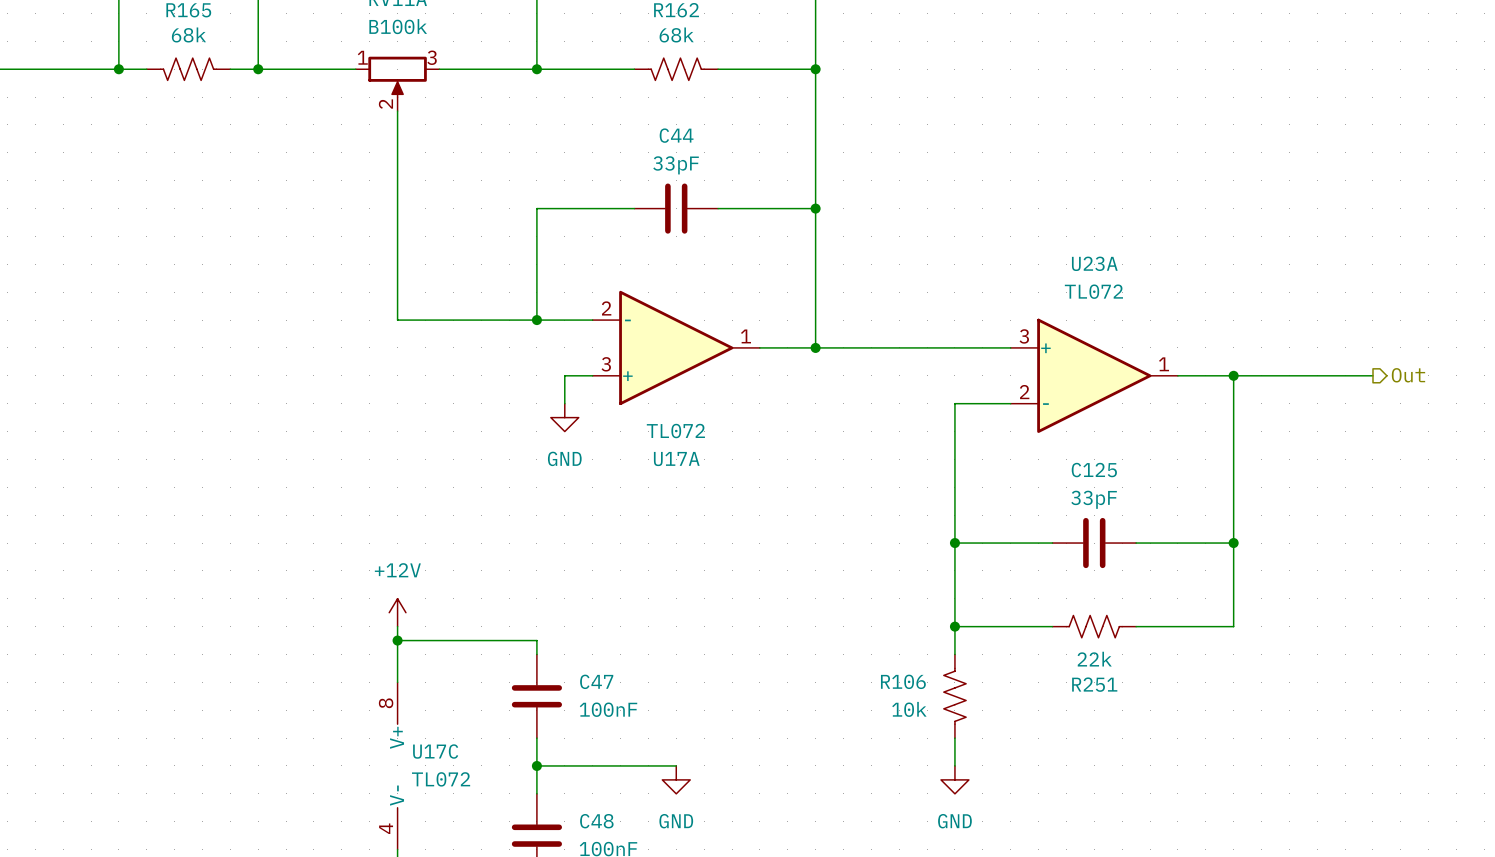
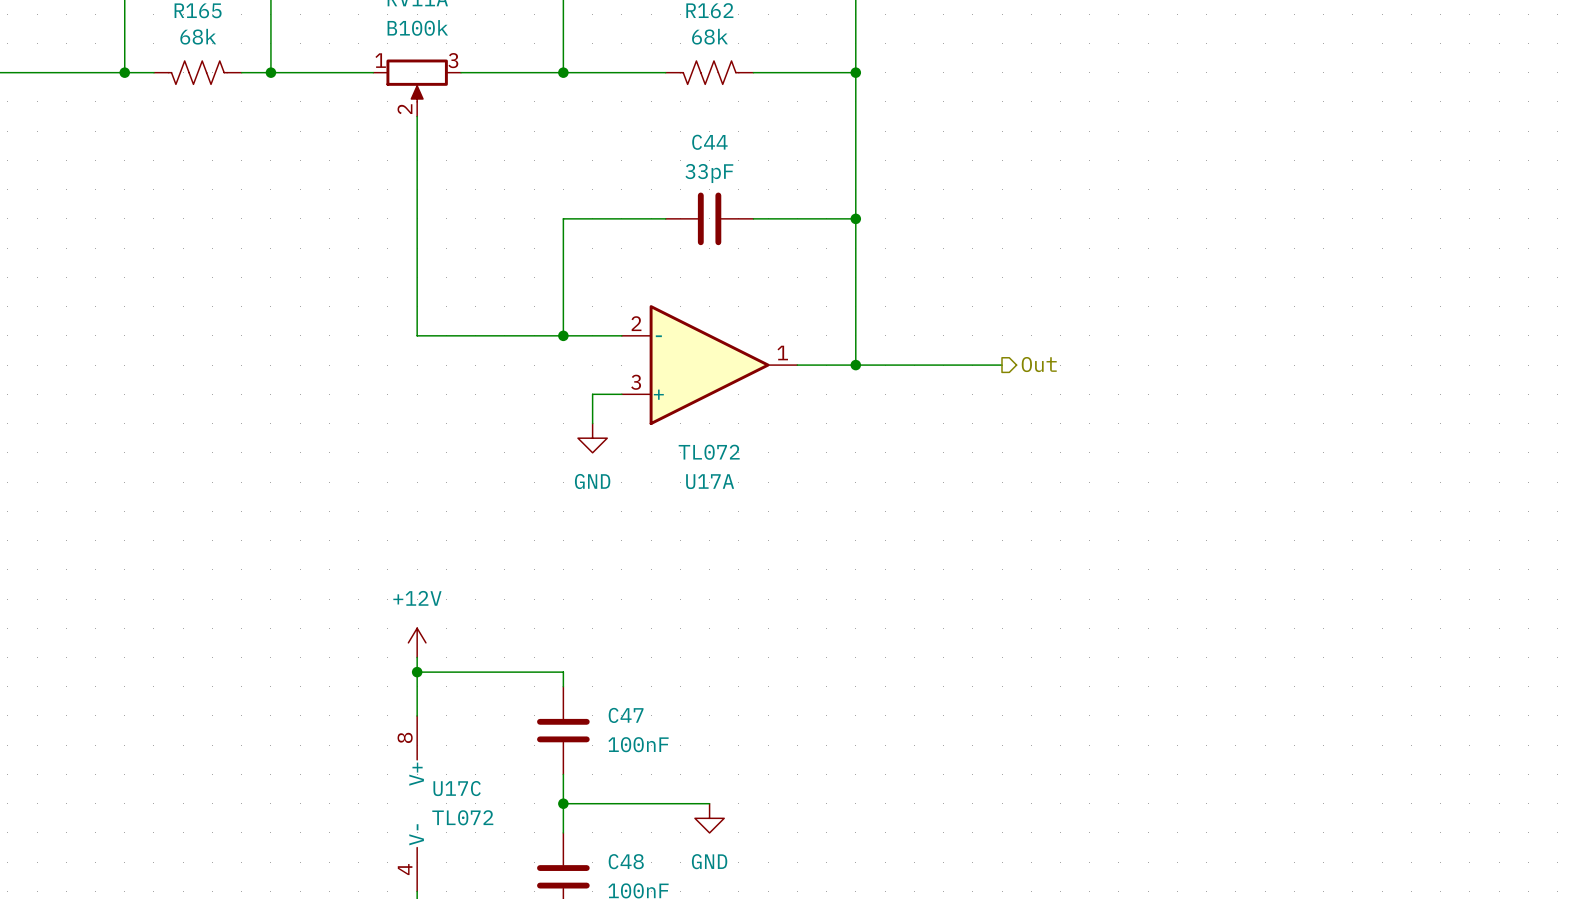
wire: (954, 347) (1010, 347) -> none
hierarchical label: none -> Out (1039, 364)
U23A: TL072 (1094, 375) -> none
wire: (1177, 375) (1372, 375) -> none
wire: (1233, 375) (1233, 626) (1136, 626) -> none
junction: (1233, 375) -> none
hierarchical label: Out (1408, 375) -> none
wire: (1010, 403) (954, 403) (954, 654) -> none
wire: (954, 543) (1052, 543) -> none
junction: (954, 543) -> none
C125: 33pF (1094, 543) -> none
wire: (1136, 543) (1233, 543) -> none
junction: (1233, 543) -> none
wire: (954, 626) (1052, 626) -> none
junction: (954, 626) -> none
R251: 22k (1094, 626) -> none
R106: 10k (954, 696) -> none
wire: (954, 738) (954, 765) -> none
power symbol: GND (954, 779) -> none

